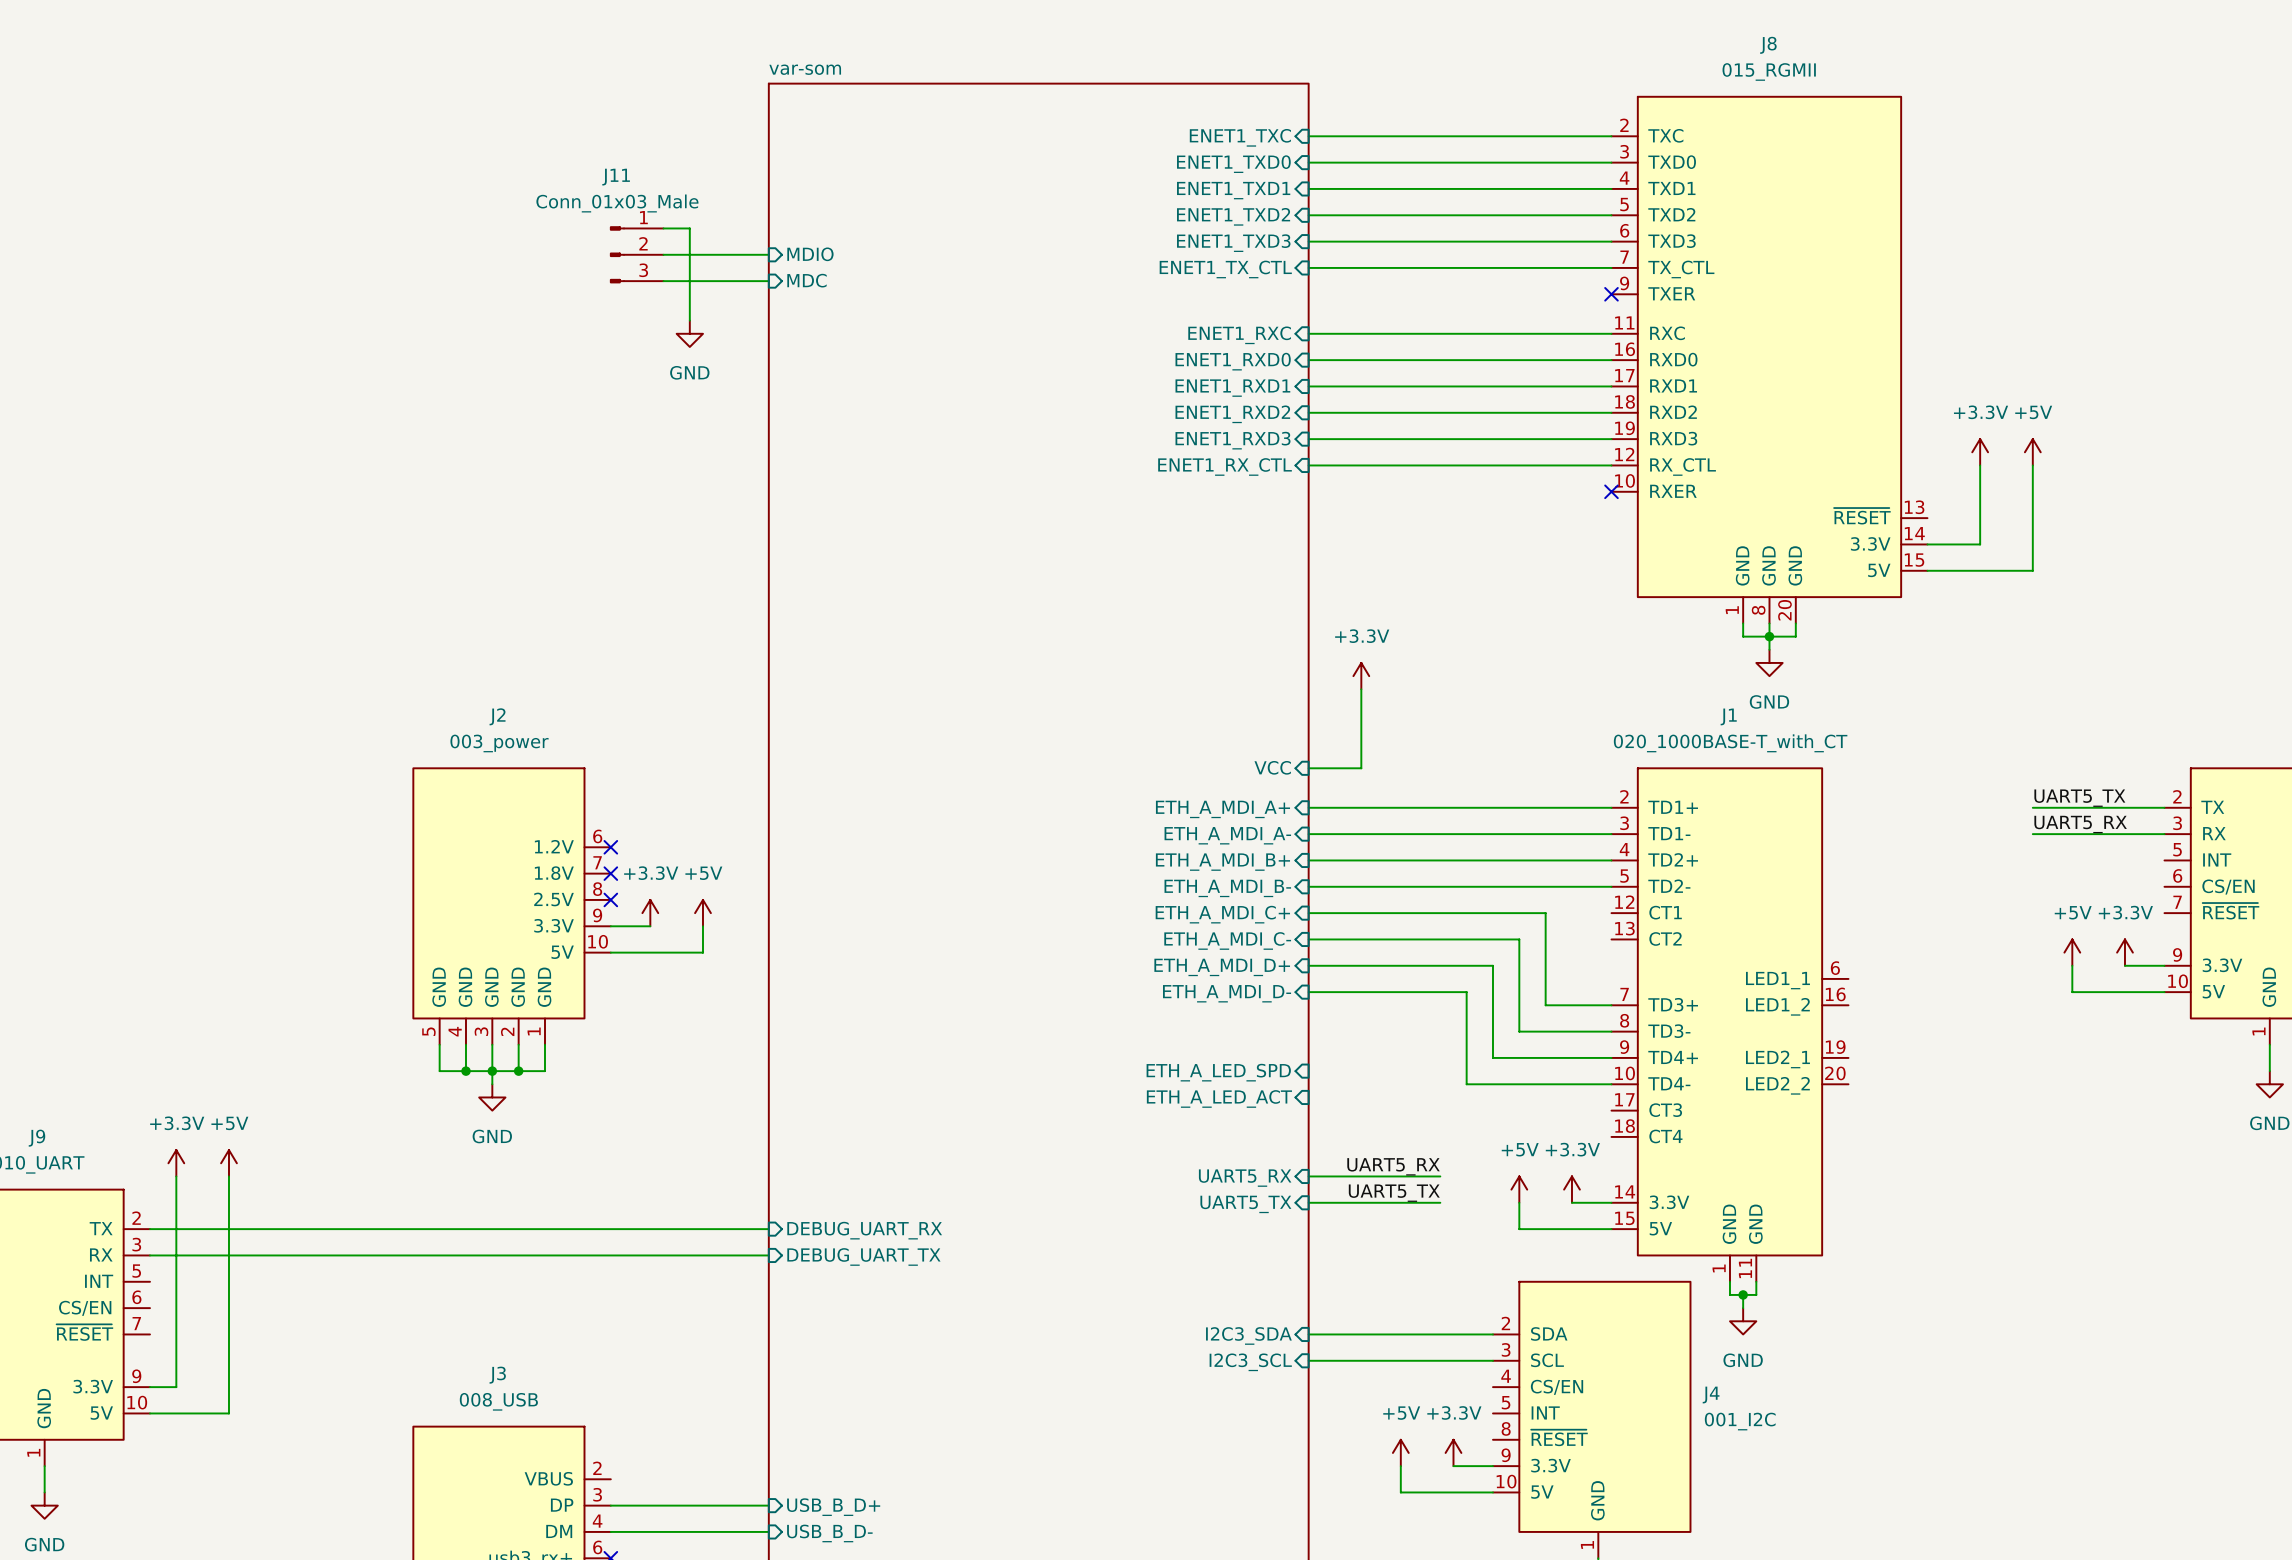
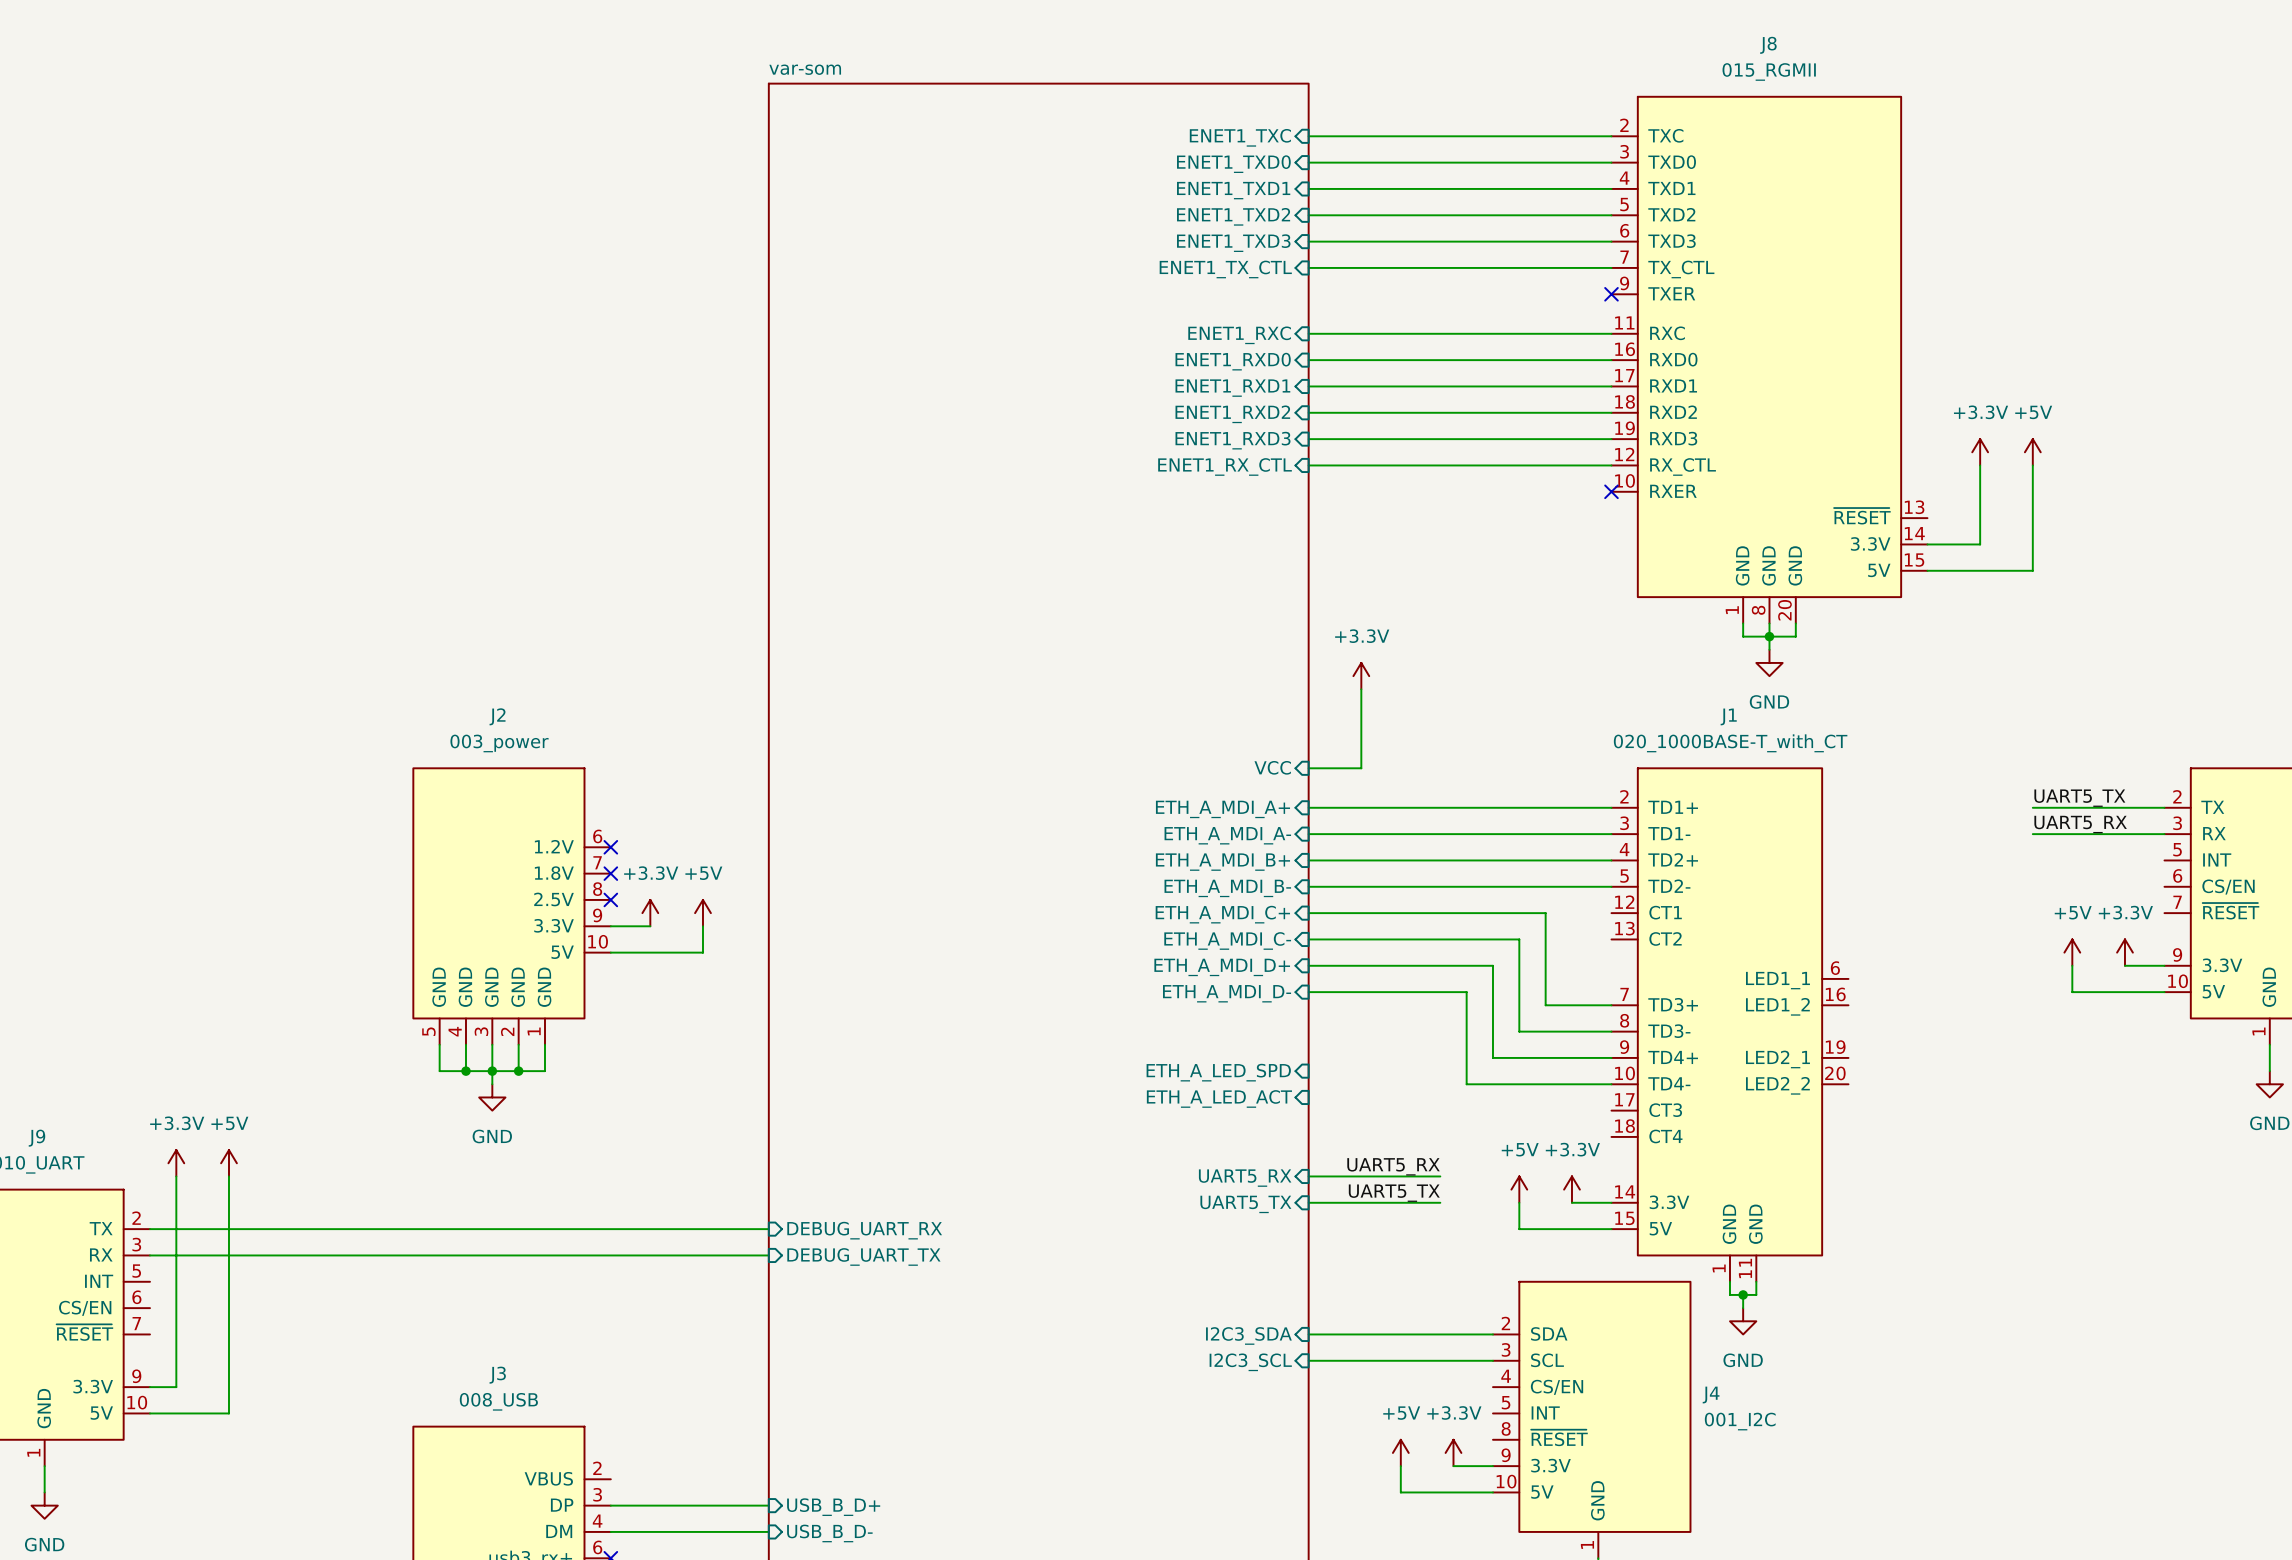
wire: (663, 228) (689, 228) (689, 320) -> none
J11: Conn_01x03_Male (636, 254) -> none
wire: (663, 254) (768, 254) -> none
sheet pin: MDIO (810, 254) -> none
sheet pin: MDC (806, 280) -> none
wire: (663, 281) (768, 281) -> none
power symbol: GND (689, 333) -> none

